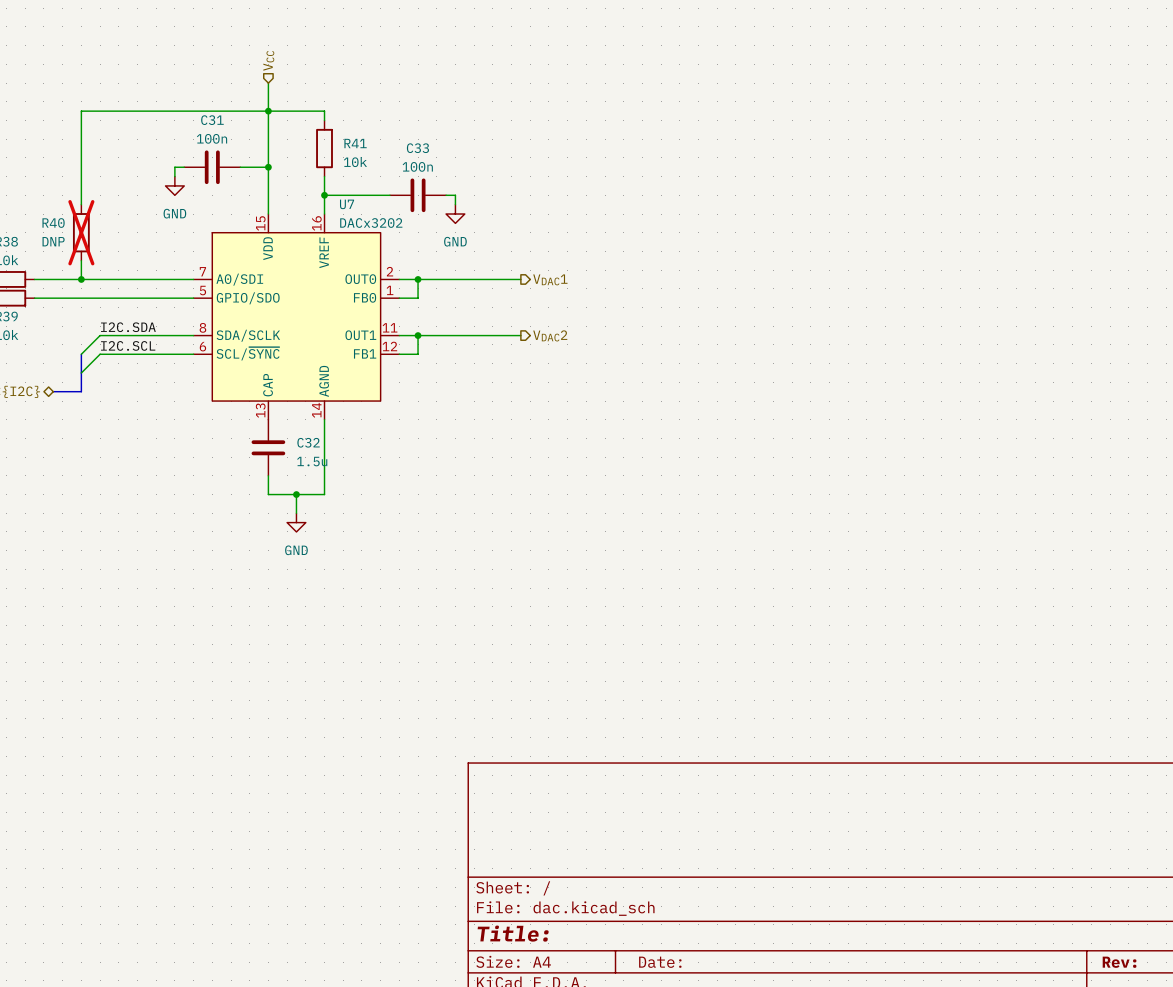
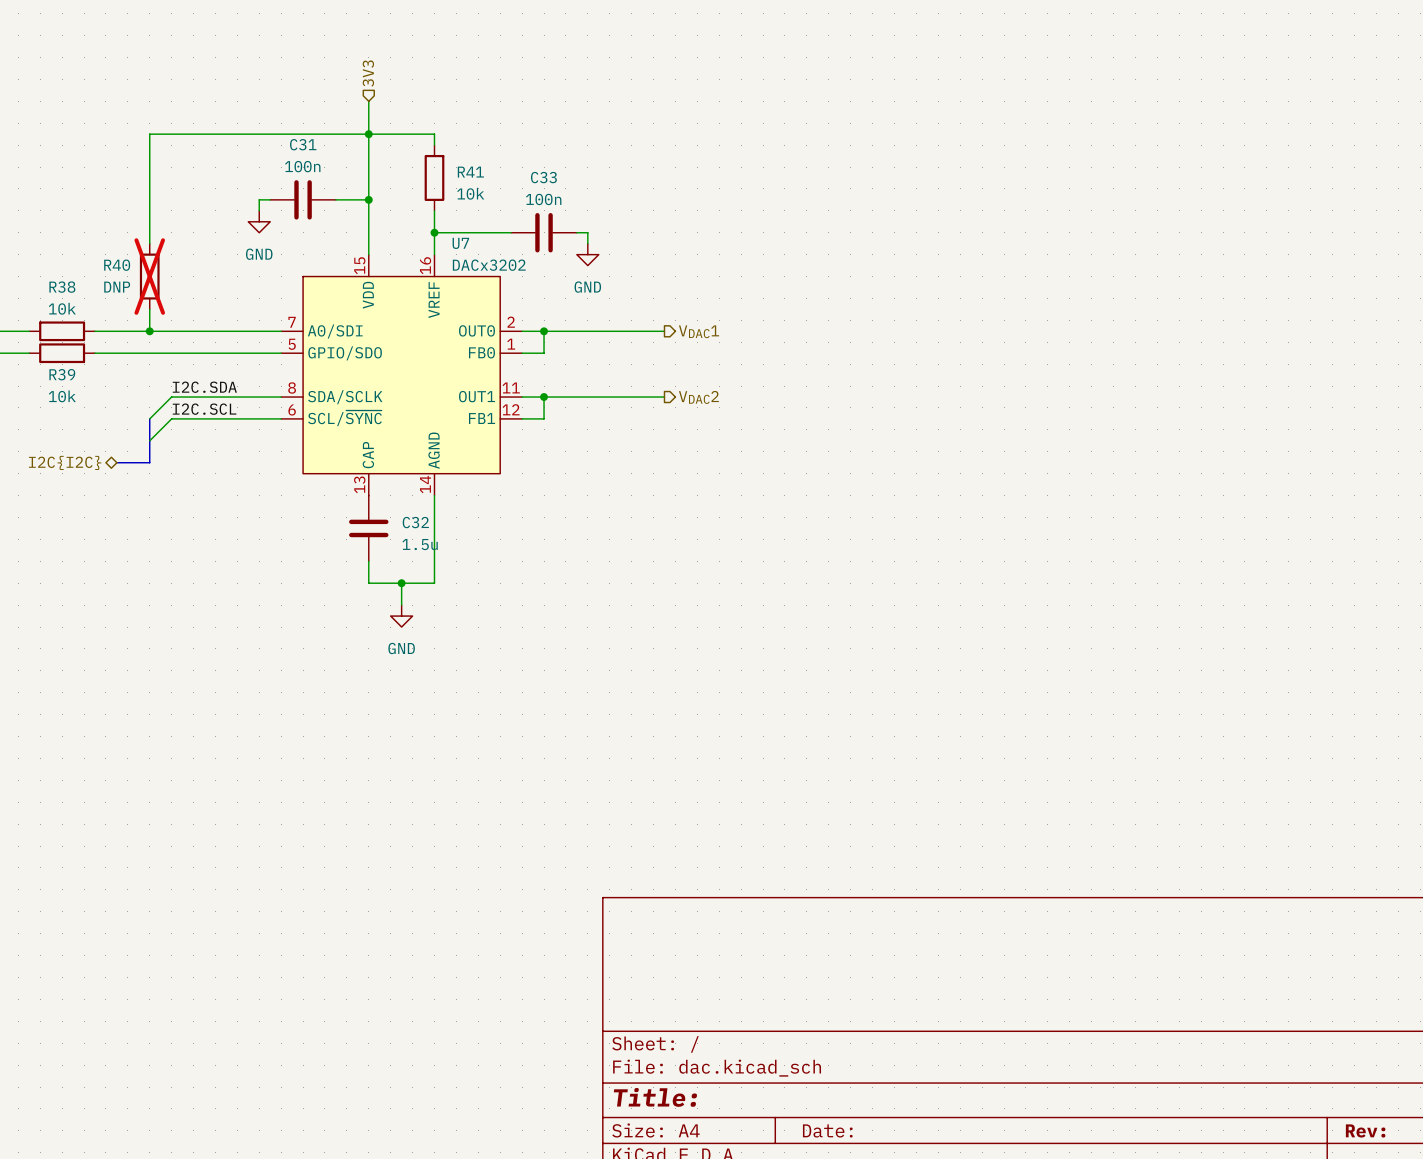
hierarchical label: VCC (268, 60) -> 3V3 (368, 73)

